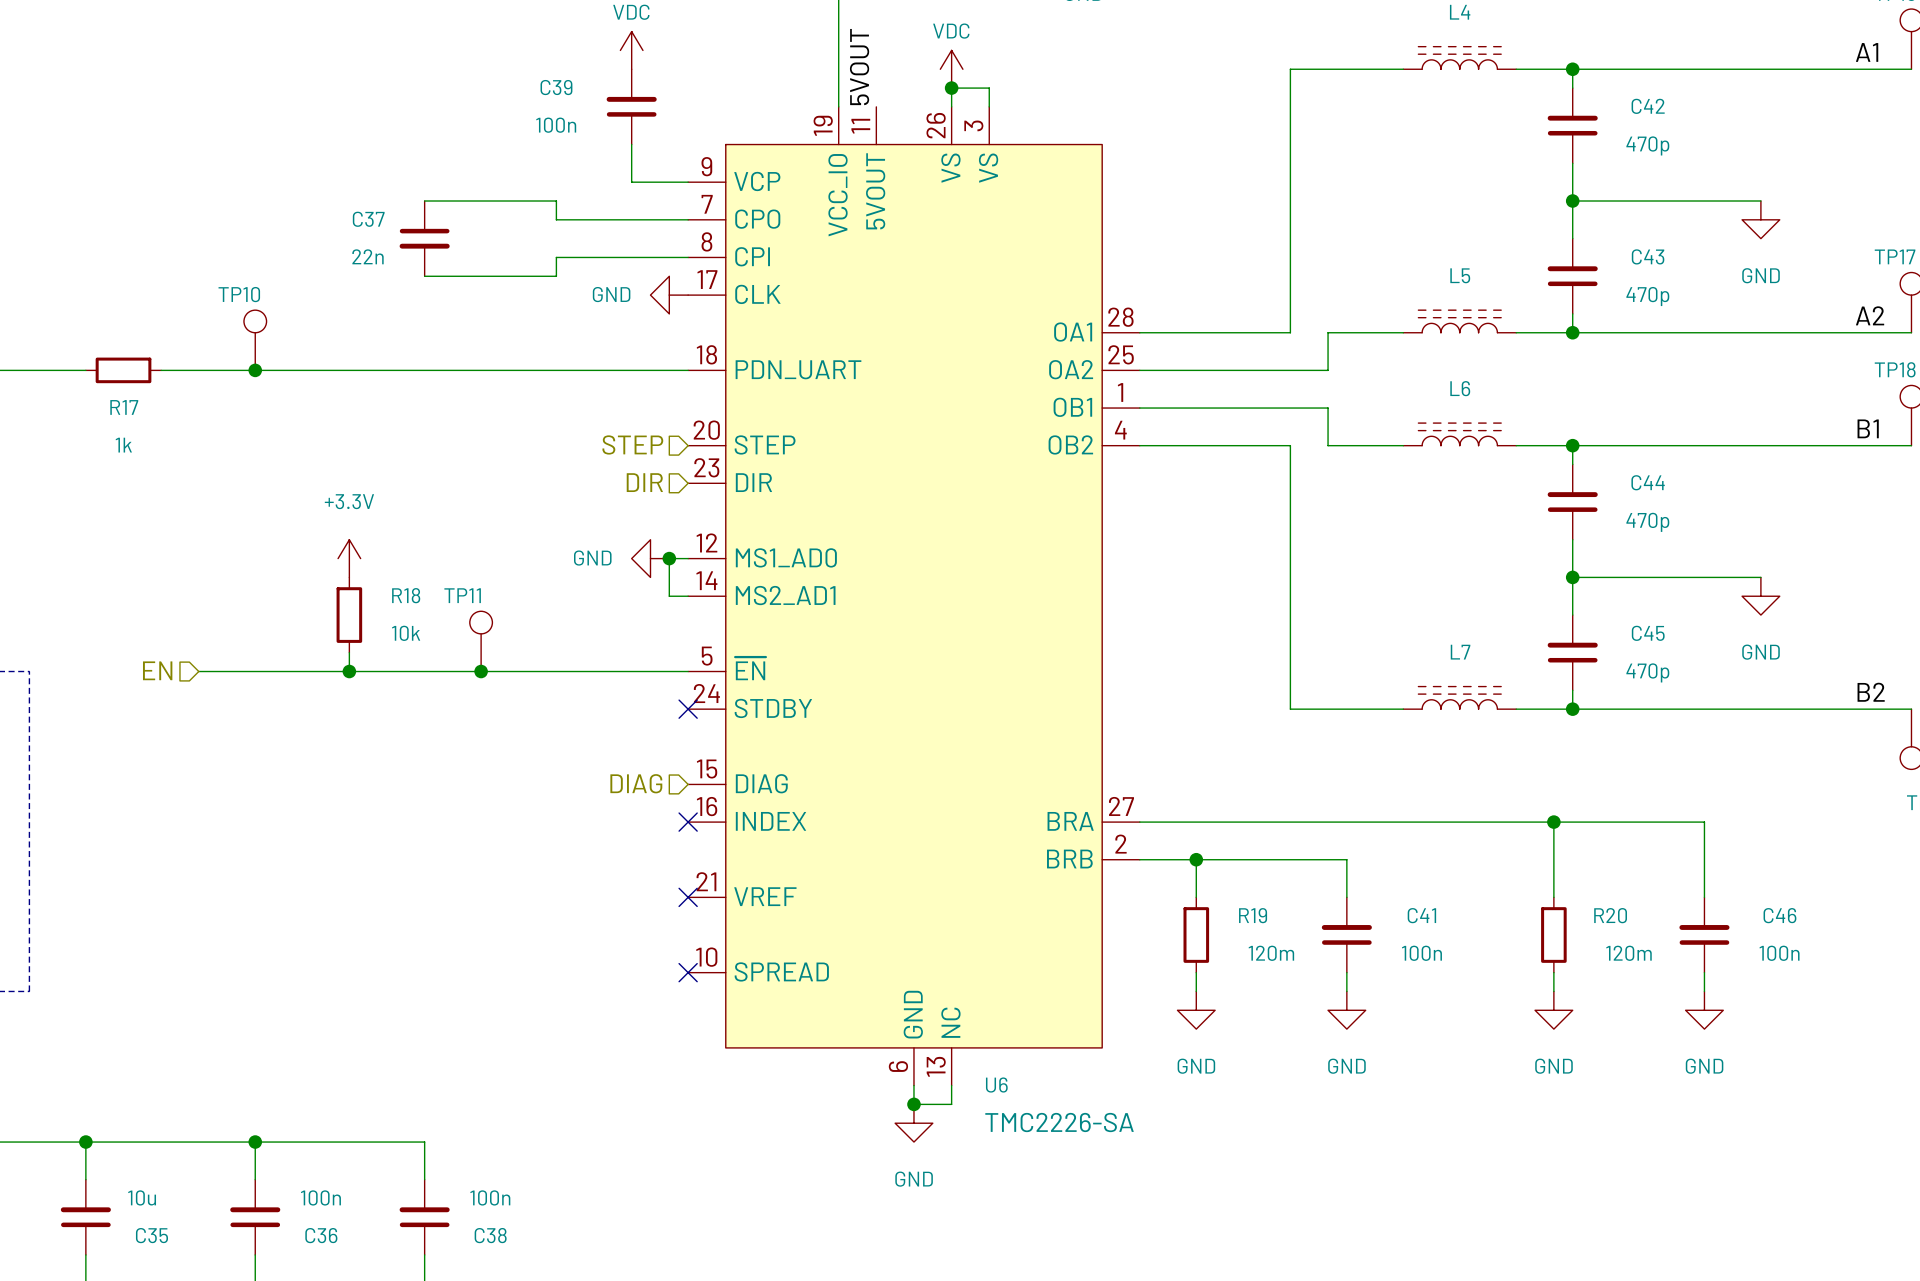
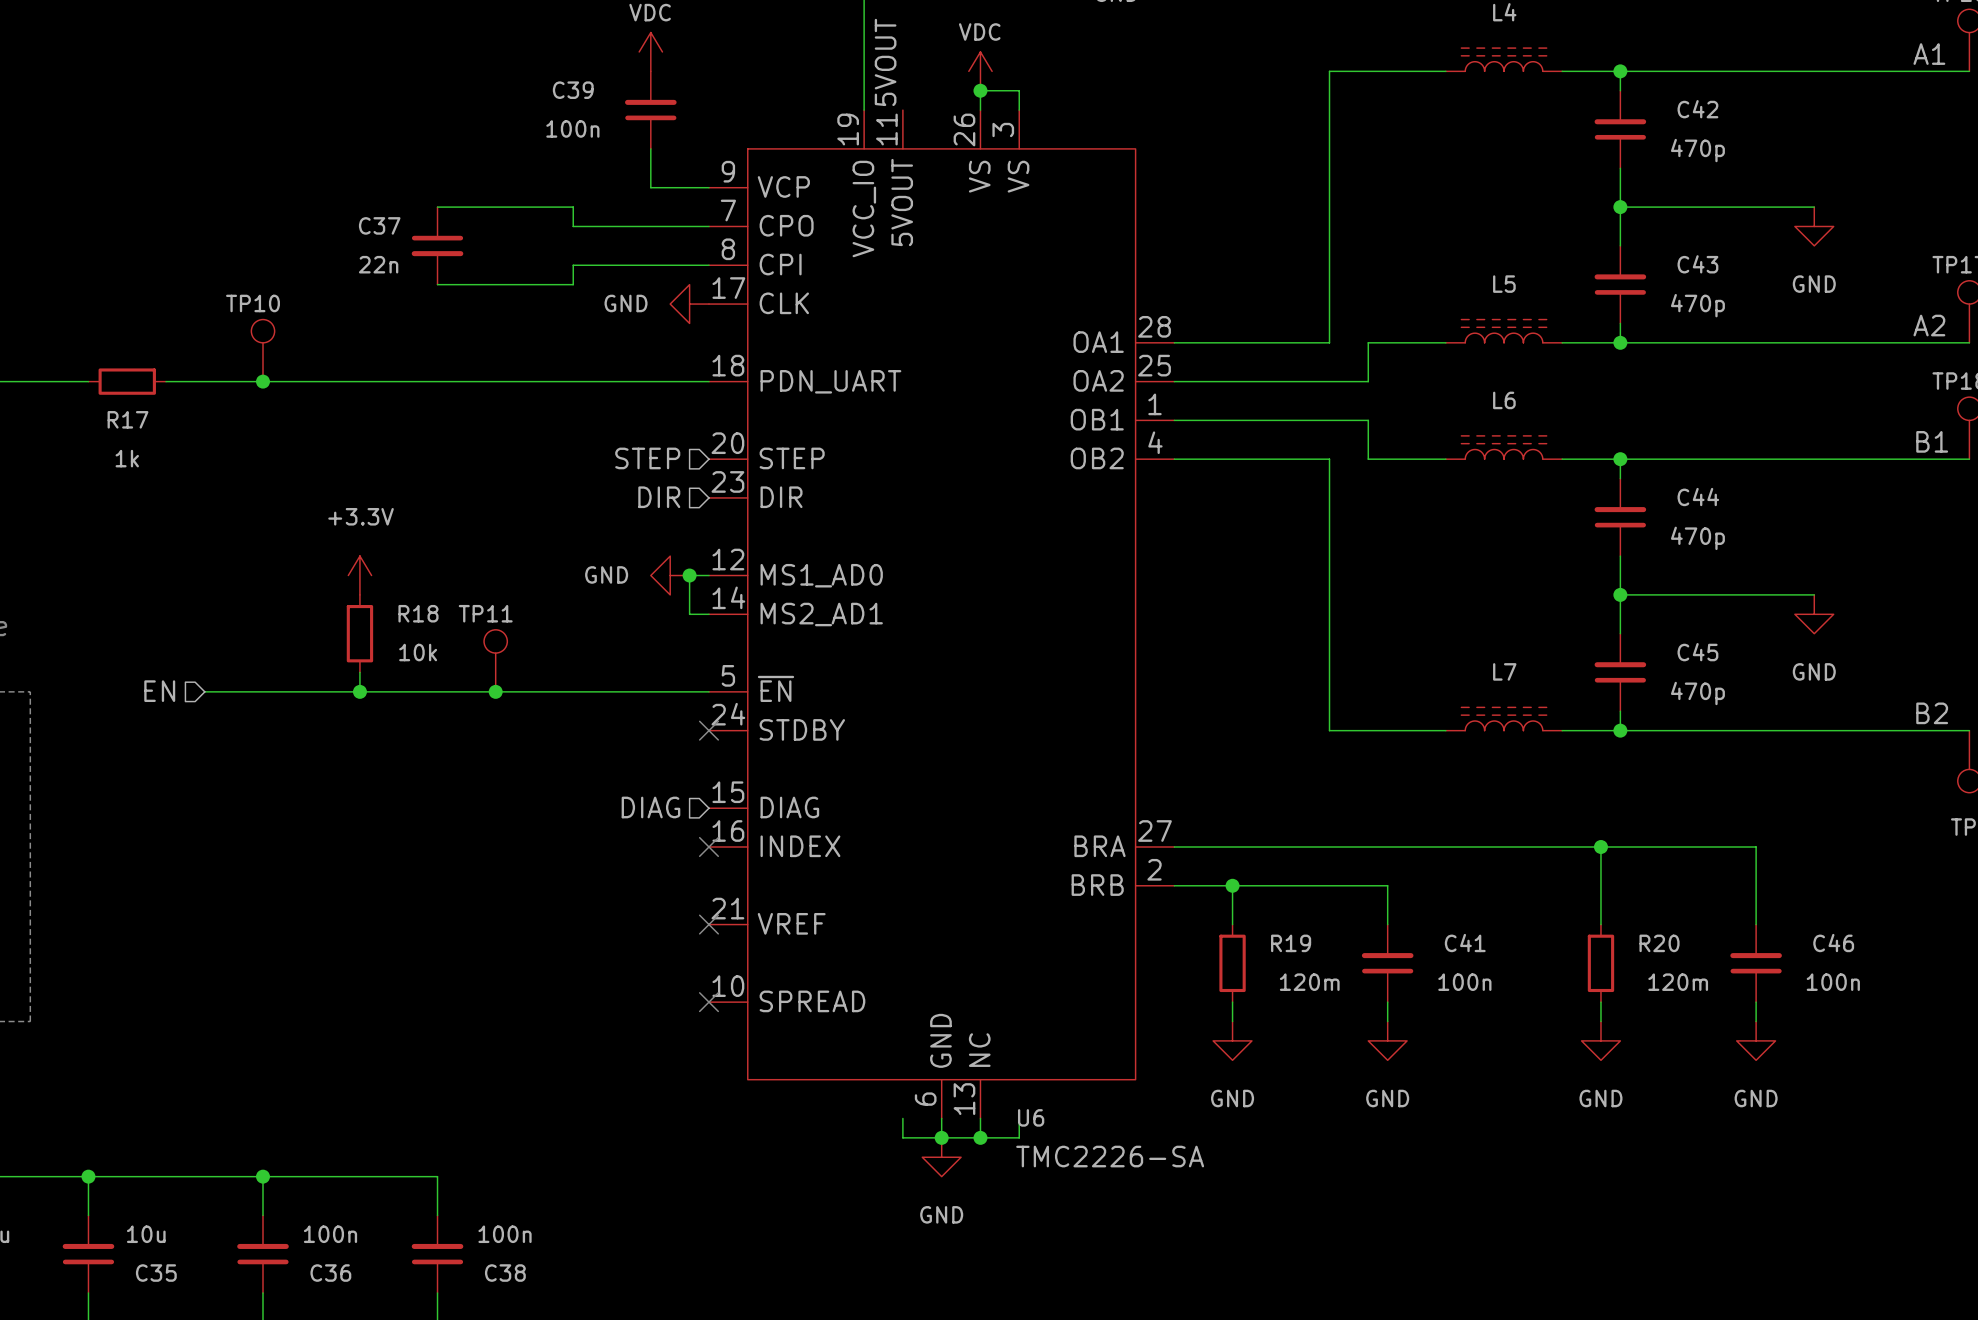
wire: none -> (902, 1118) (902, 1137) (941, 1137)
wire: none -> (1019, 1118) (1019, 1137) (980, 1137)
junction: none -> (980, 1137)

